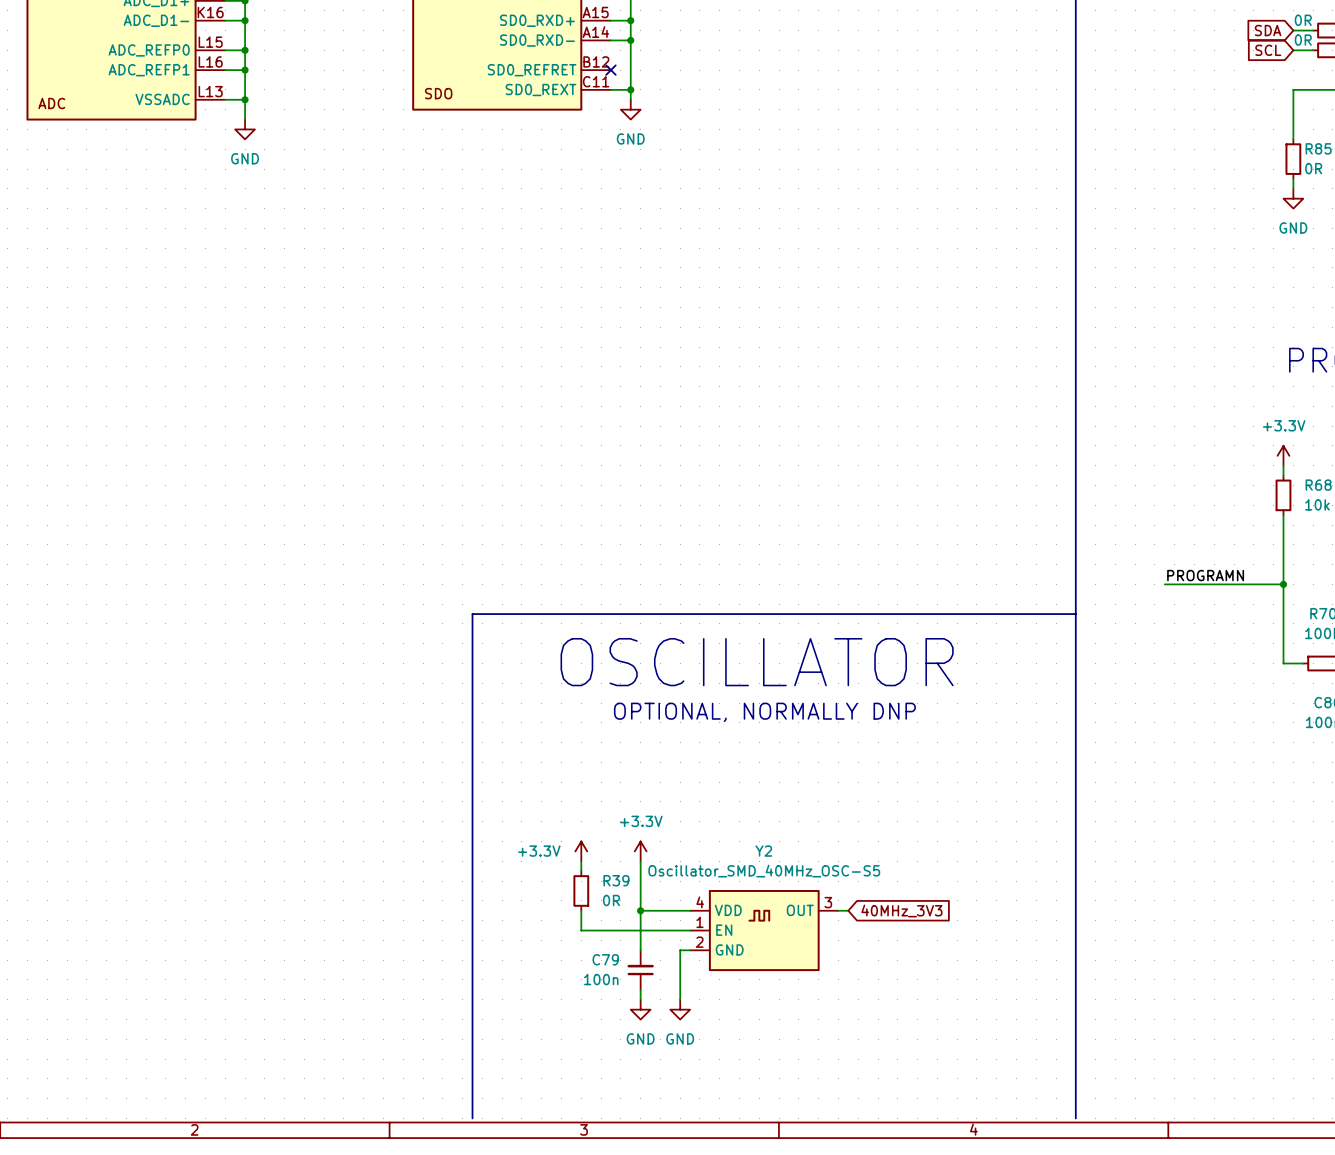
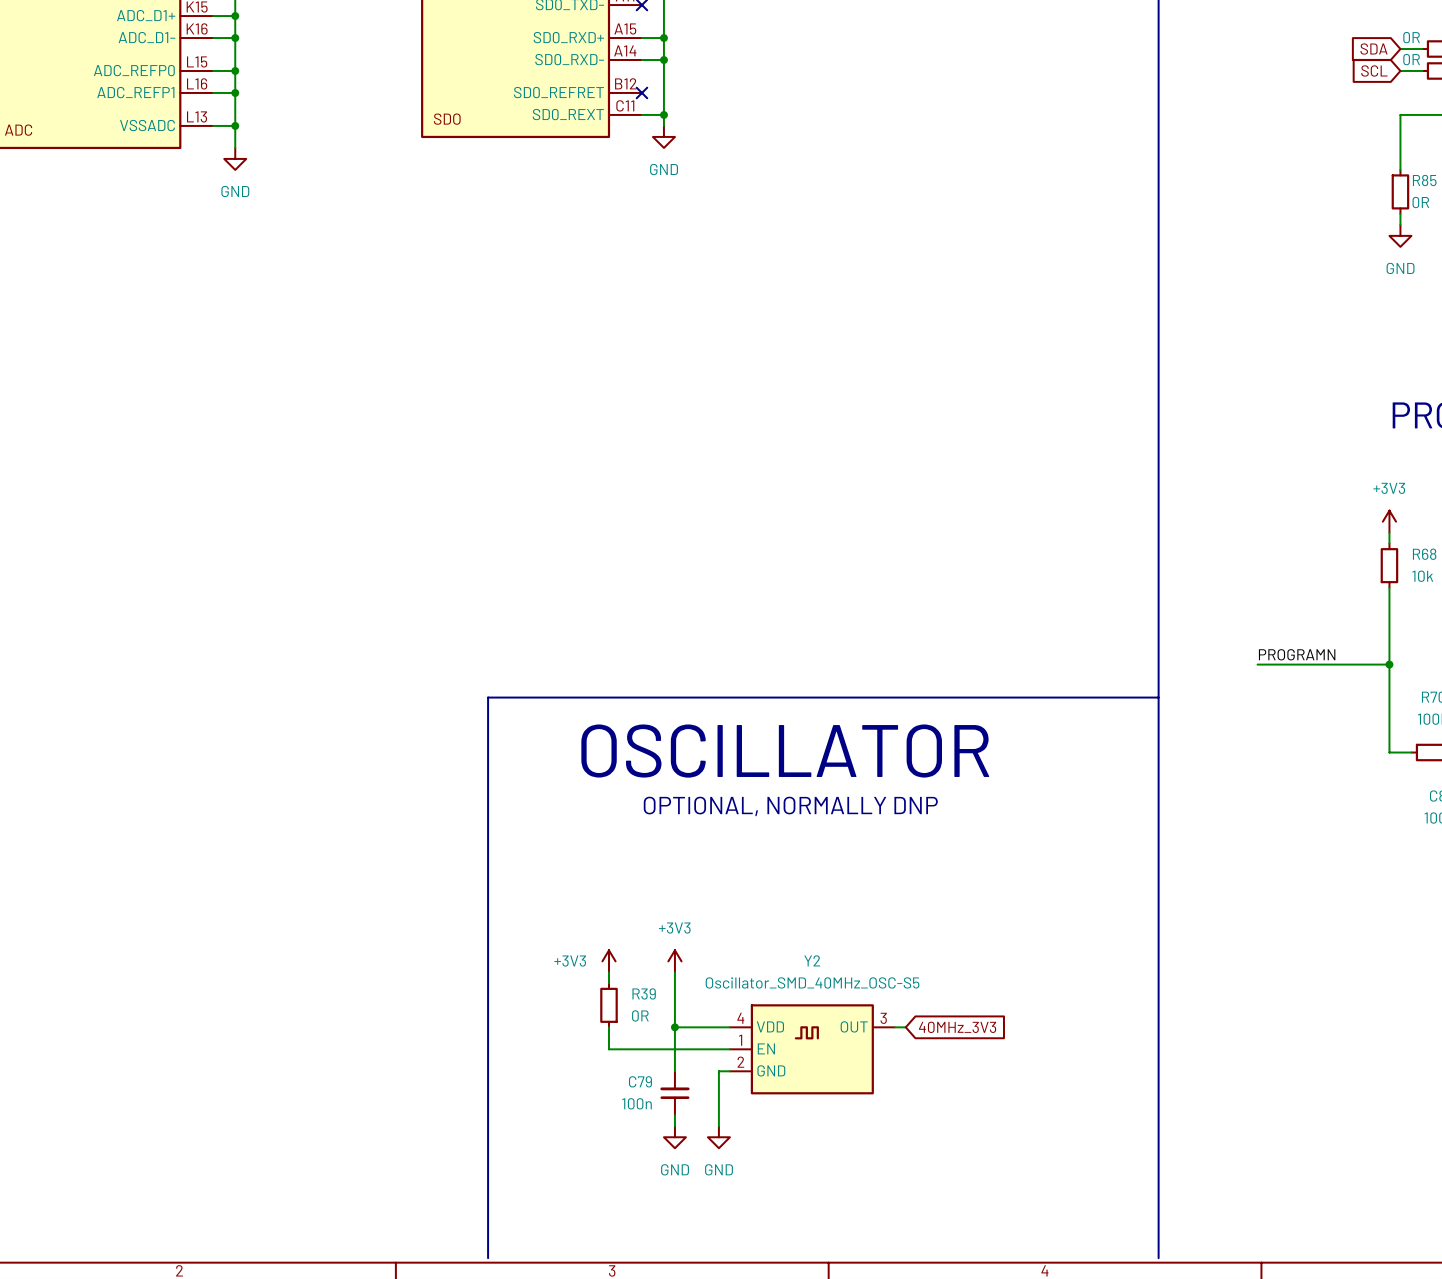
power symbol: +3.3V (1283, 455) -> +3V3 (1389, 521)
power symbol: +3.3V (581, 851) -> +3V3 (608, 961)
power symbol: +3.3V (640, 851) -> +3V3 (674, 961)

